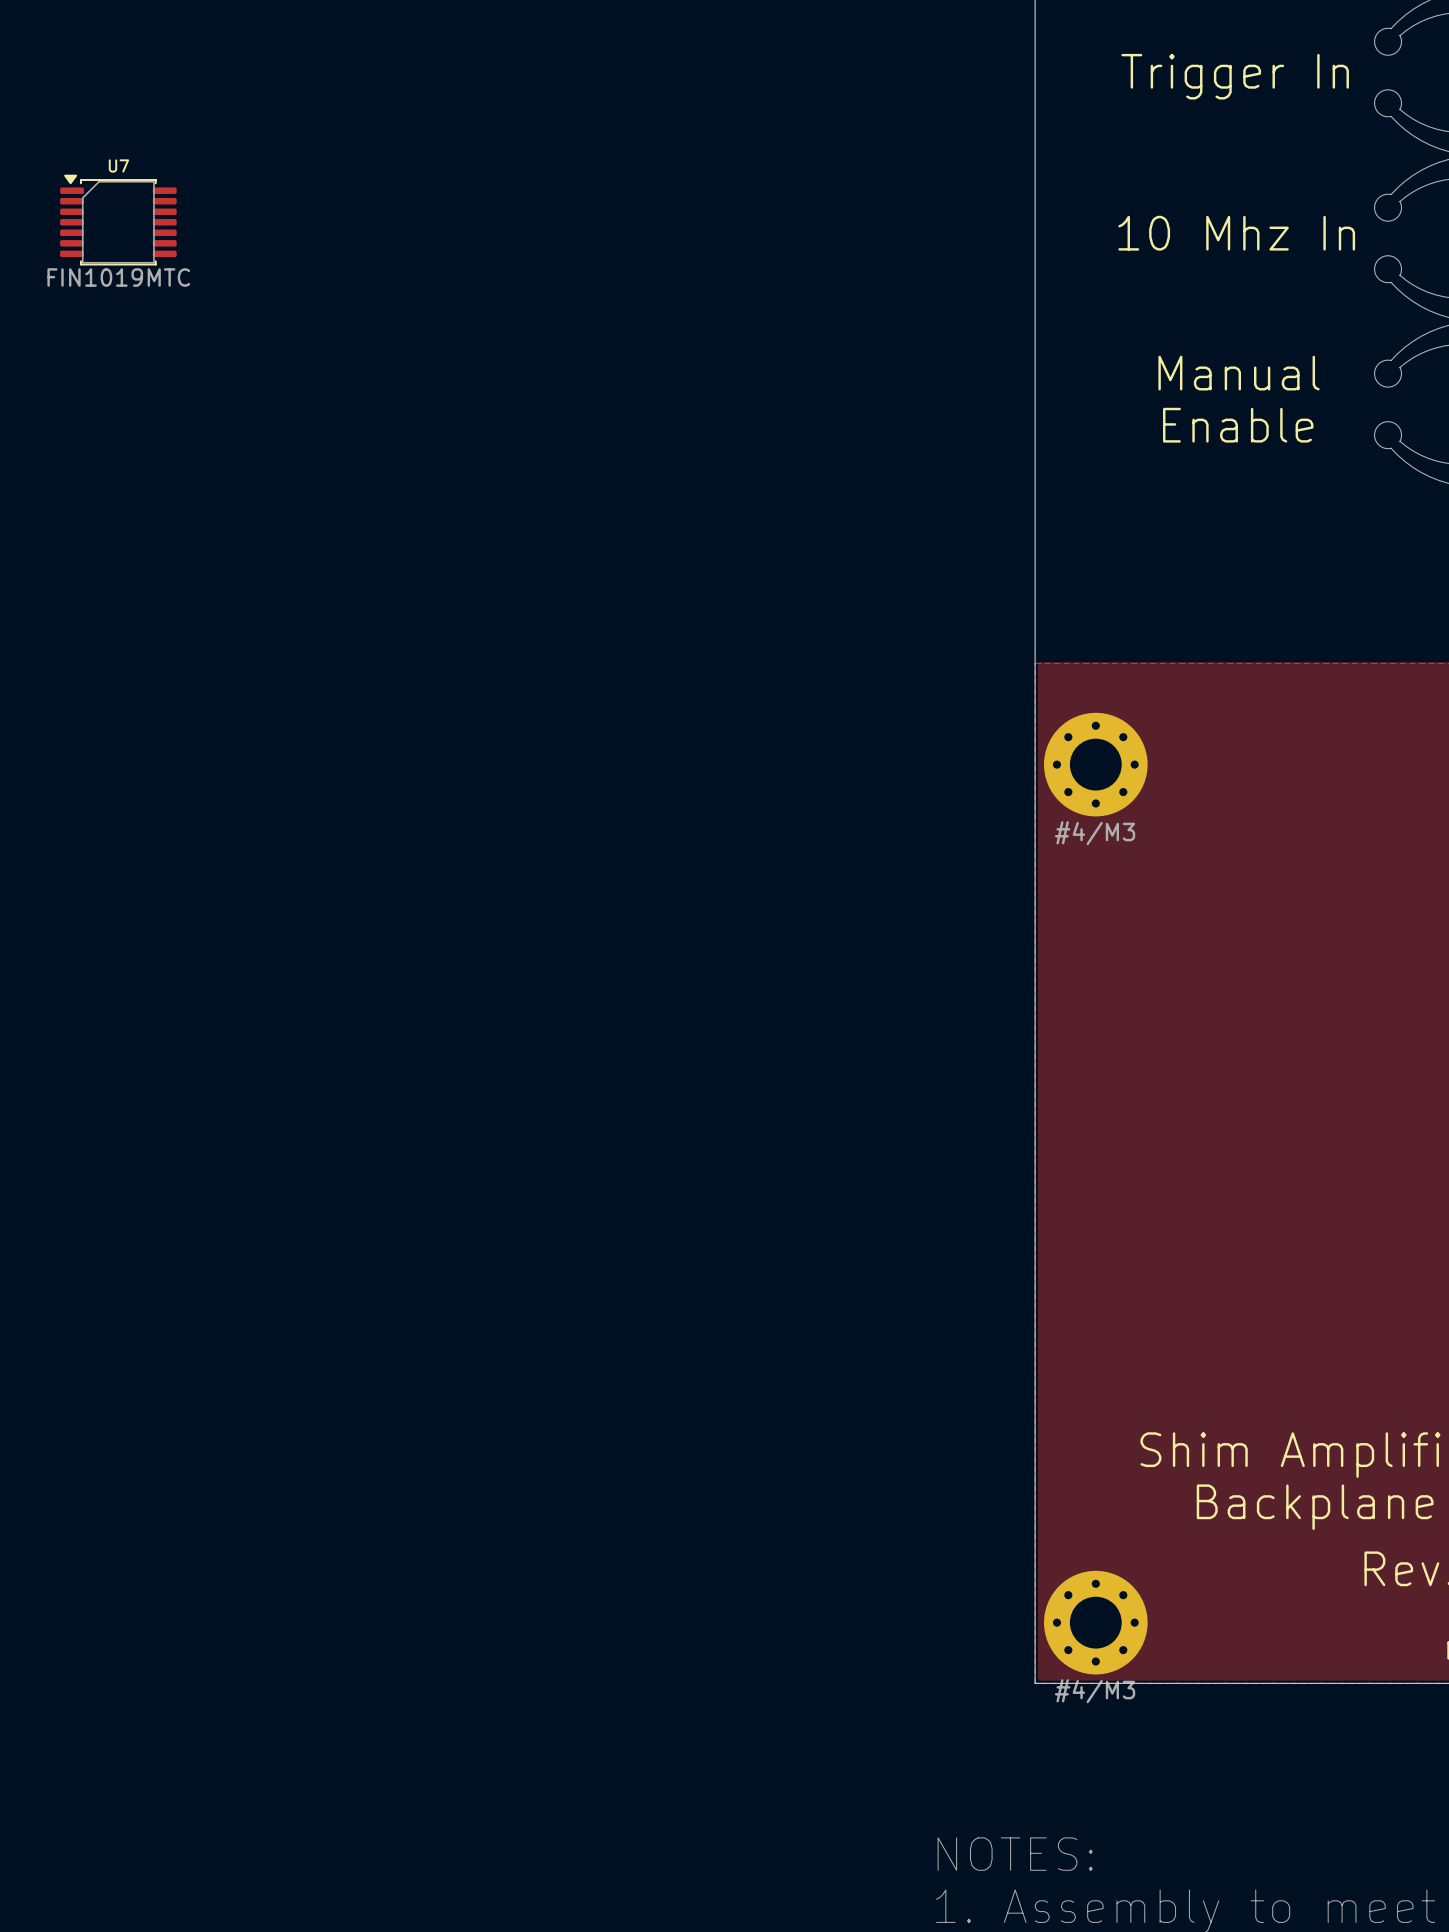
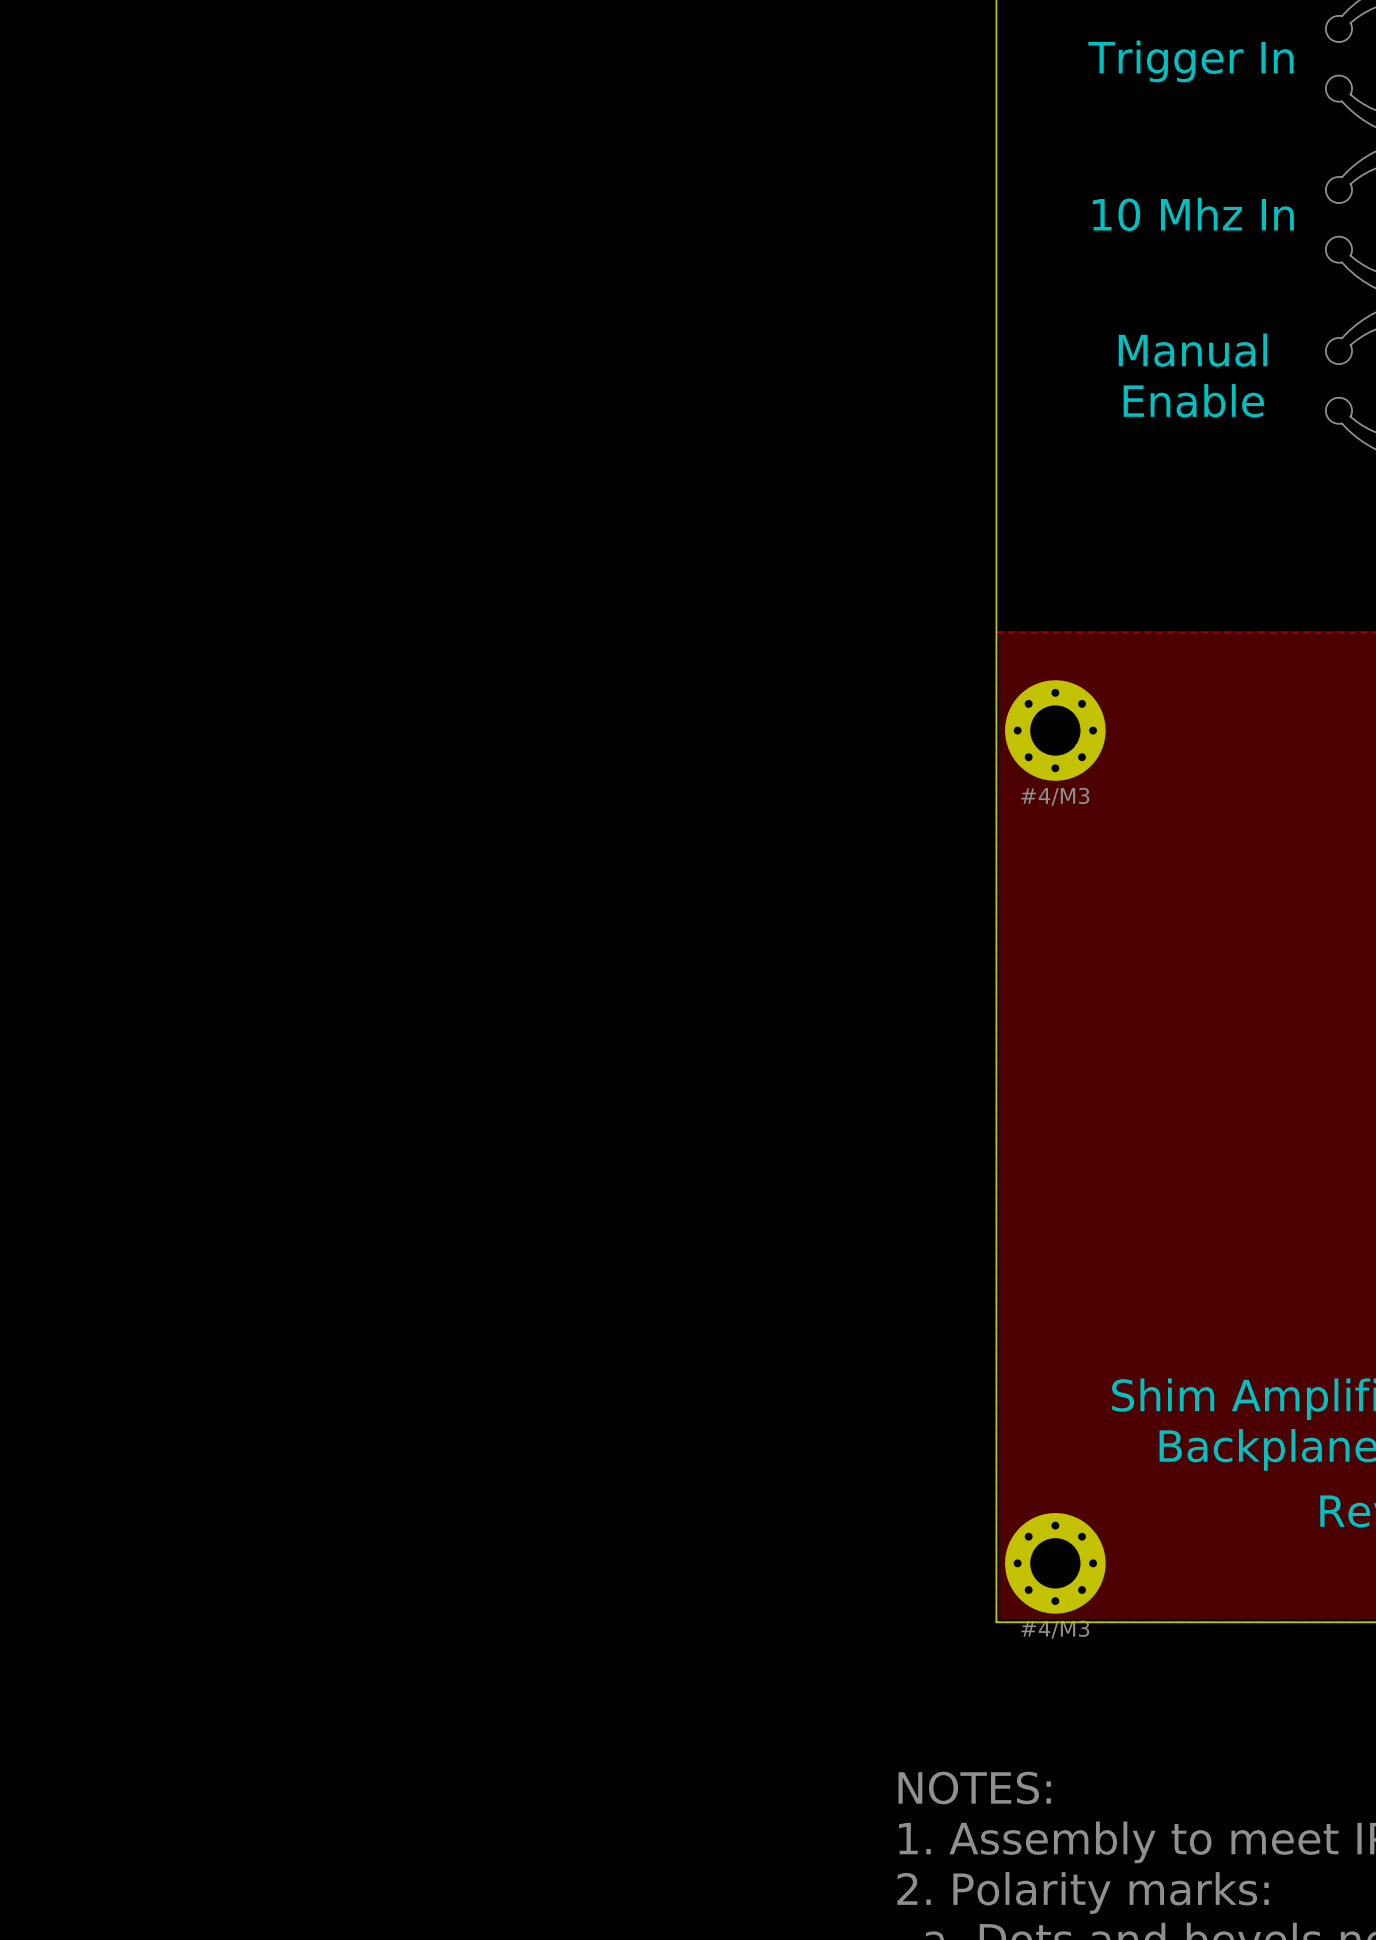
U7: FIN1019MTC (118, 220) -> none

